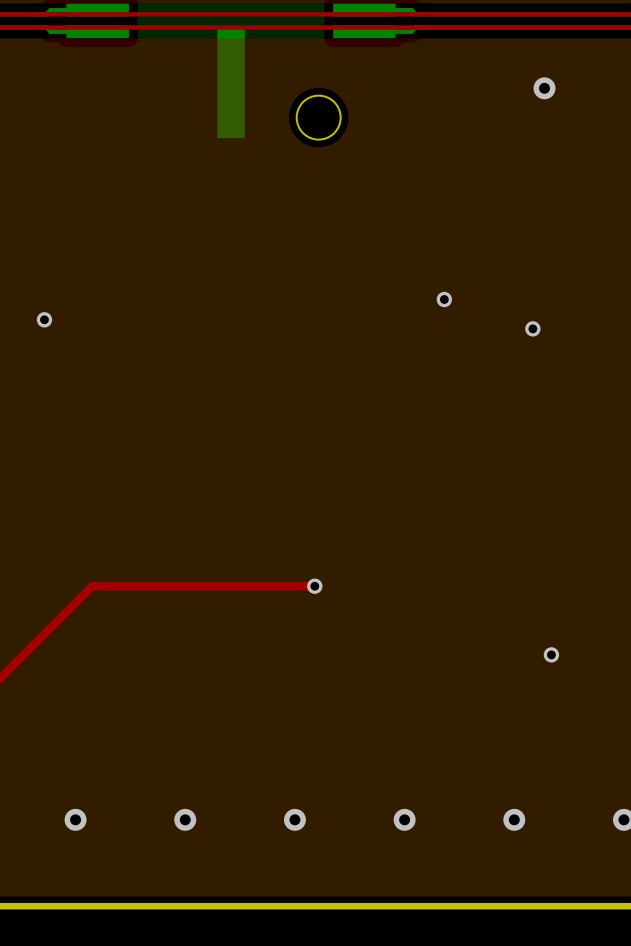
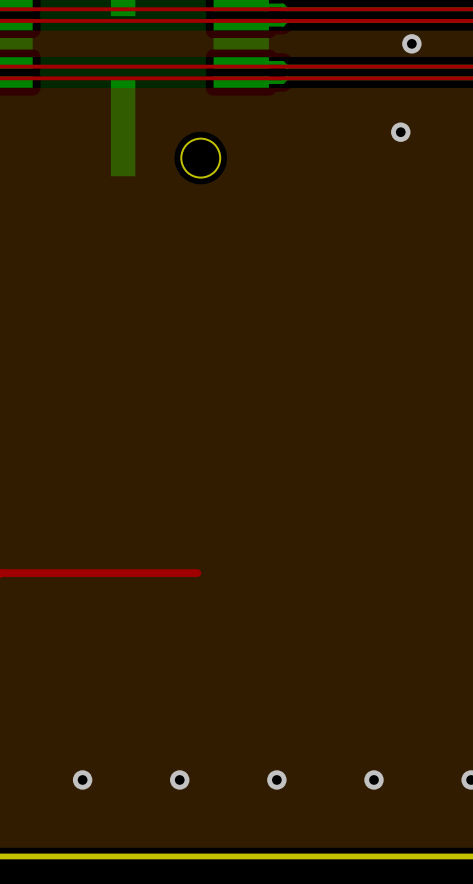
via: (444, 299) -> none
via: (532, 328) -> none
via: (314, 586) -> none
via: (551, 654) -> none

